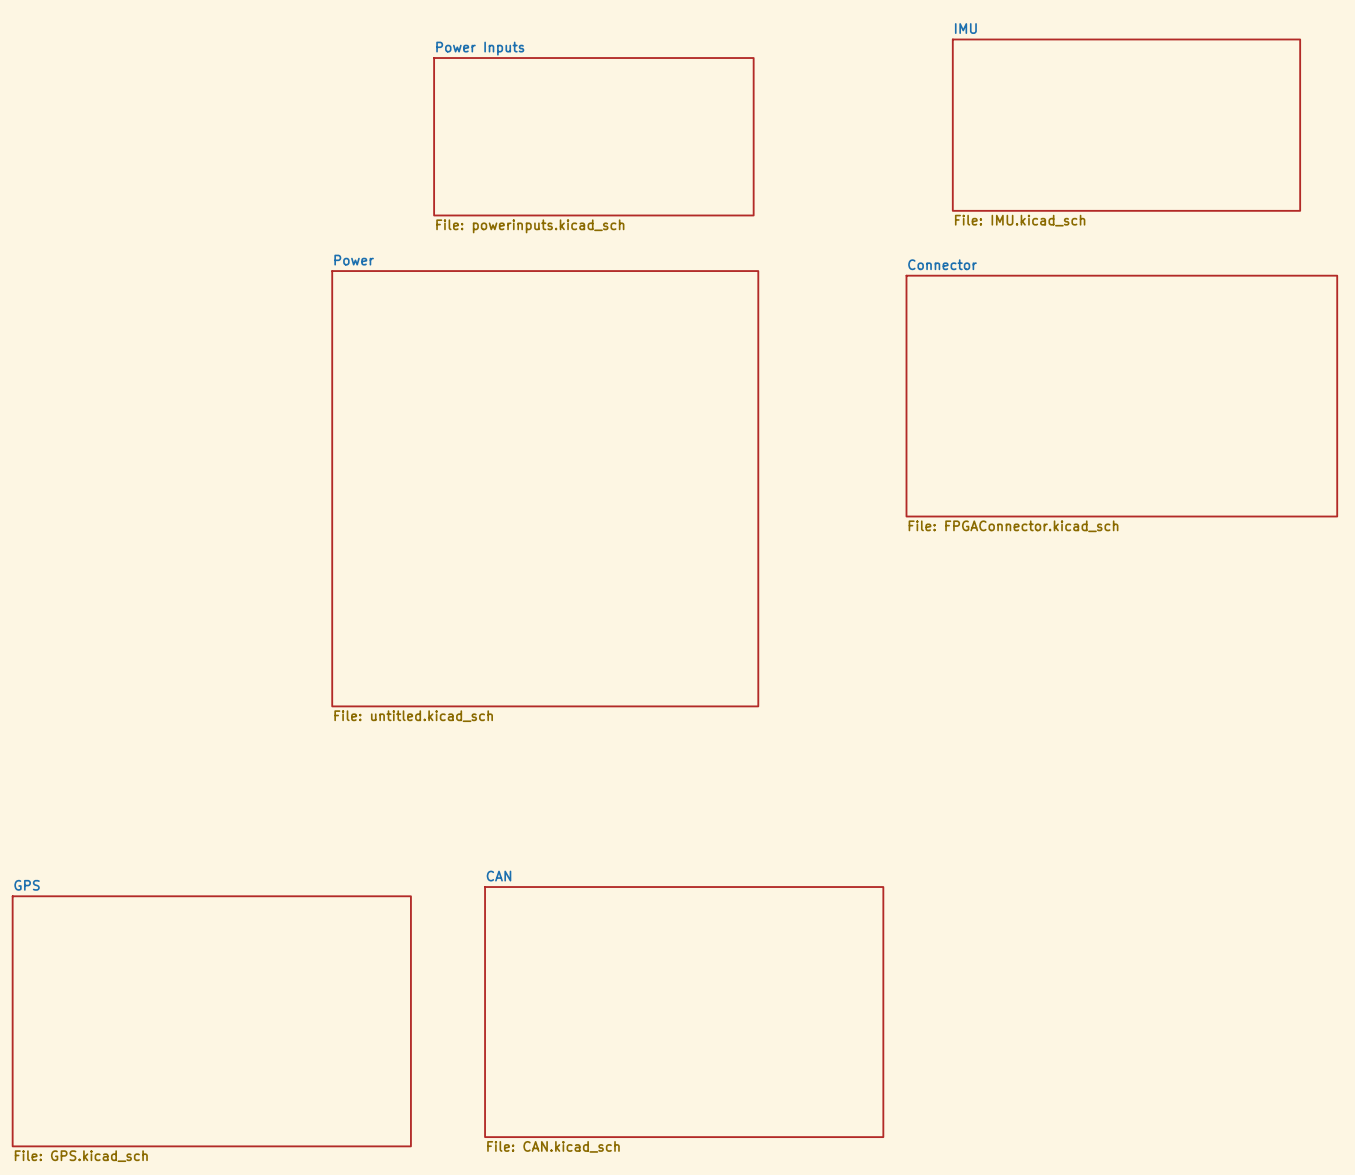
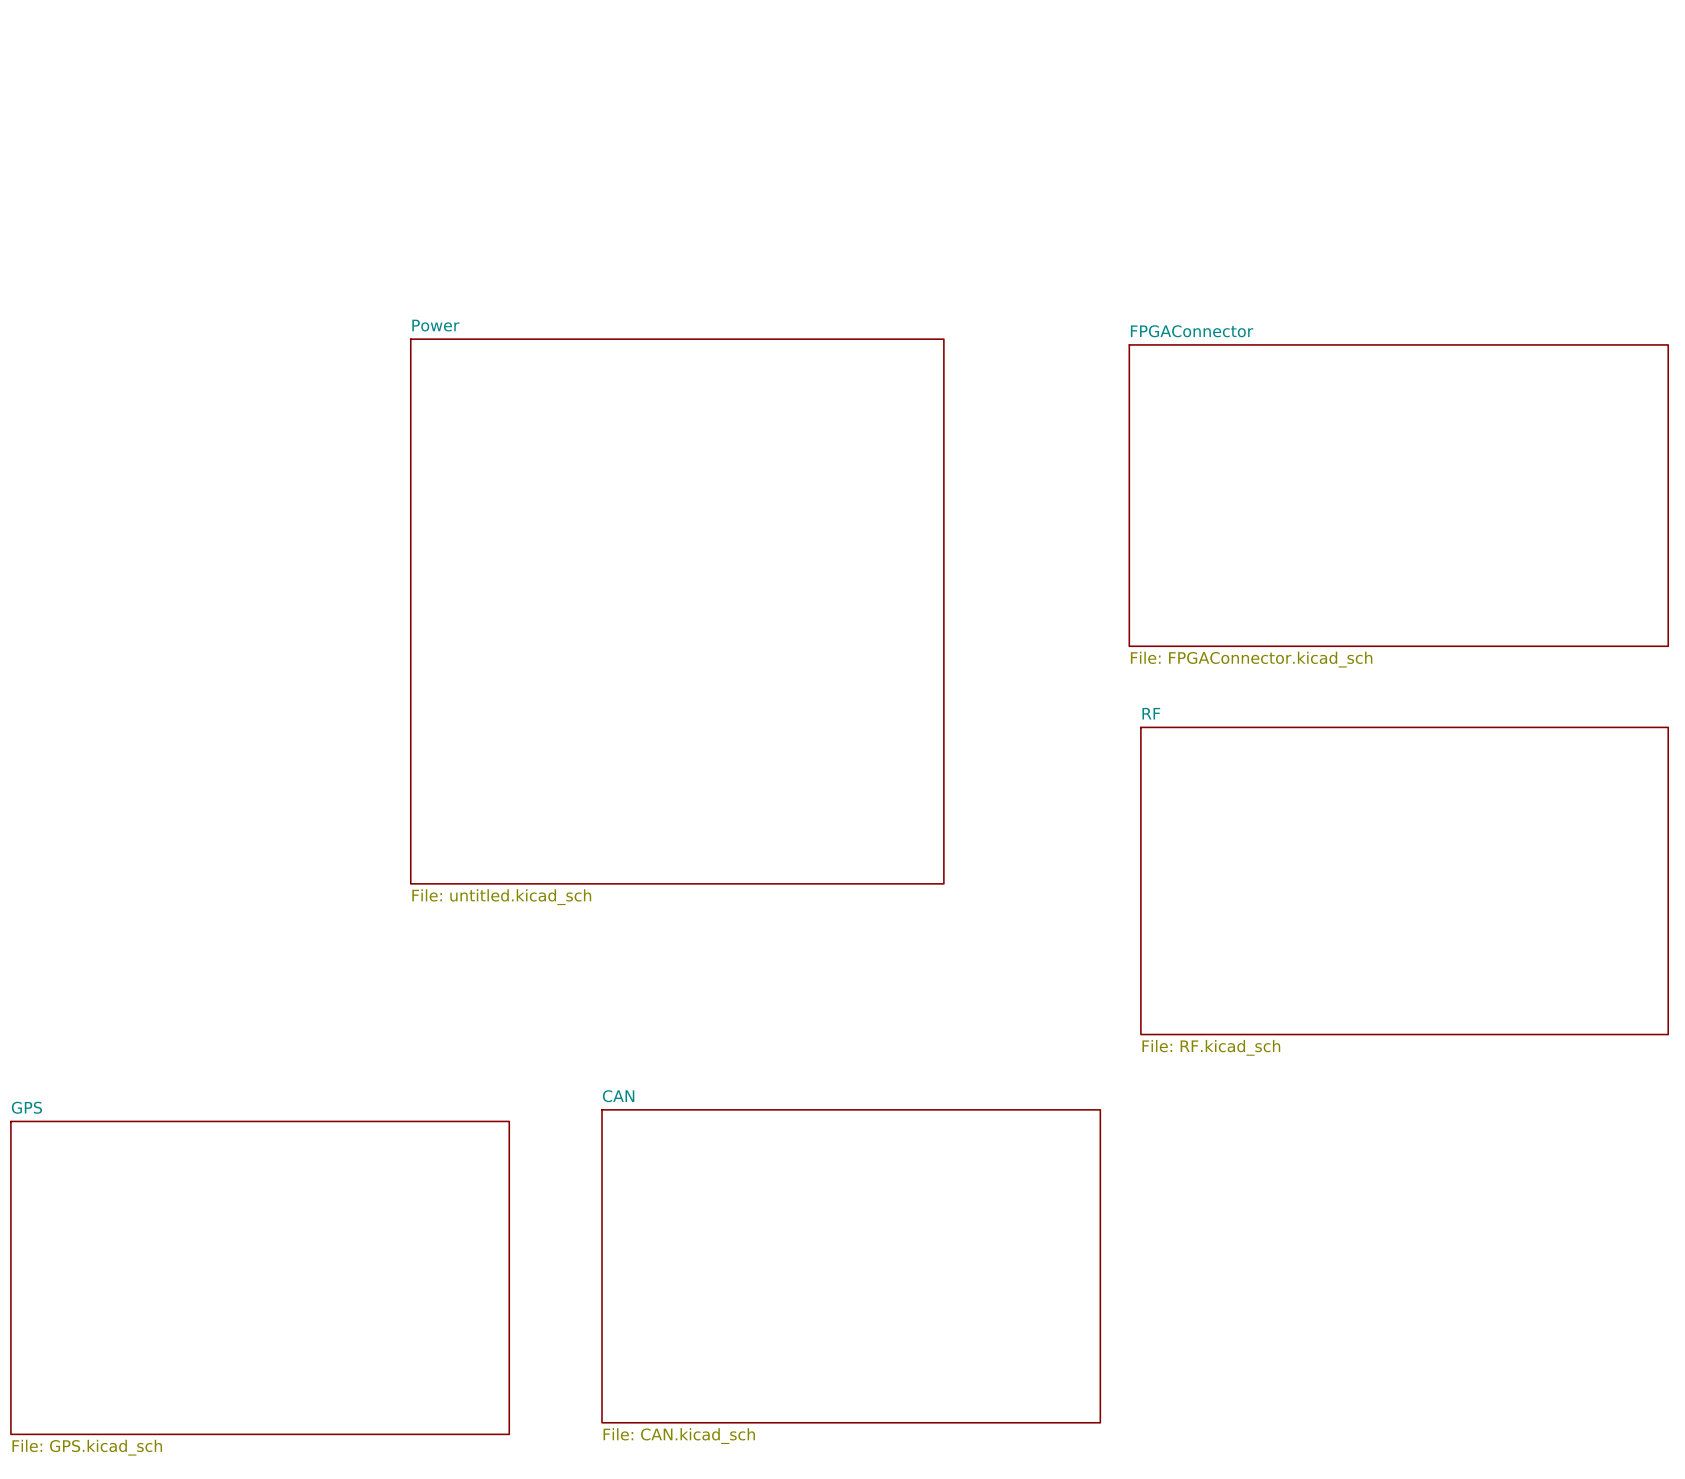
sheet IMU: File: IMU.kicad_sch (1126, 125) -> none
sheet Power Inputs: File: powerinputs.kicad_sch (593, 136) -> none
sheet Connector name: Connector (942, 264) -> FPGAConnector (1192, 331)
sheet RF: none -> File: RF.kicad_sch (1404, 880)

